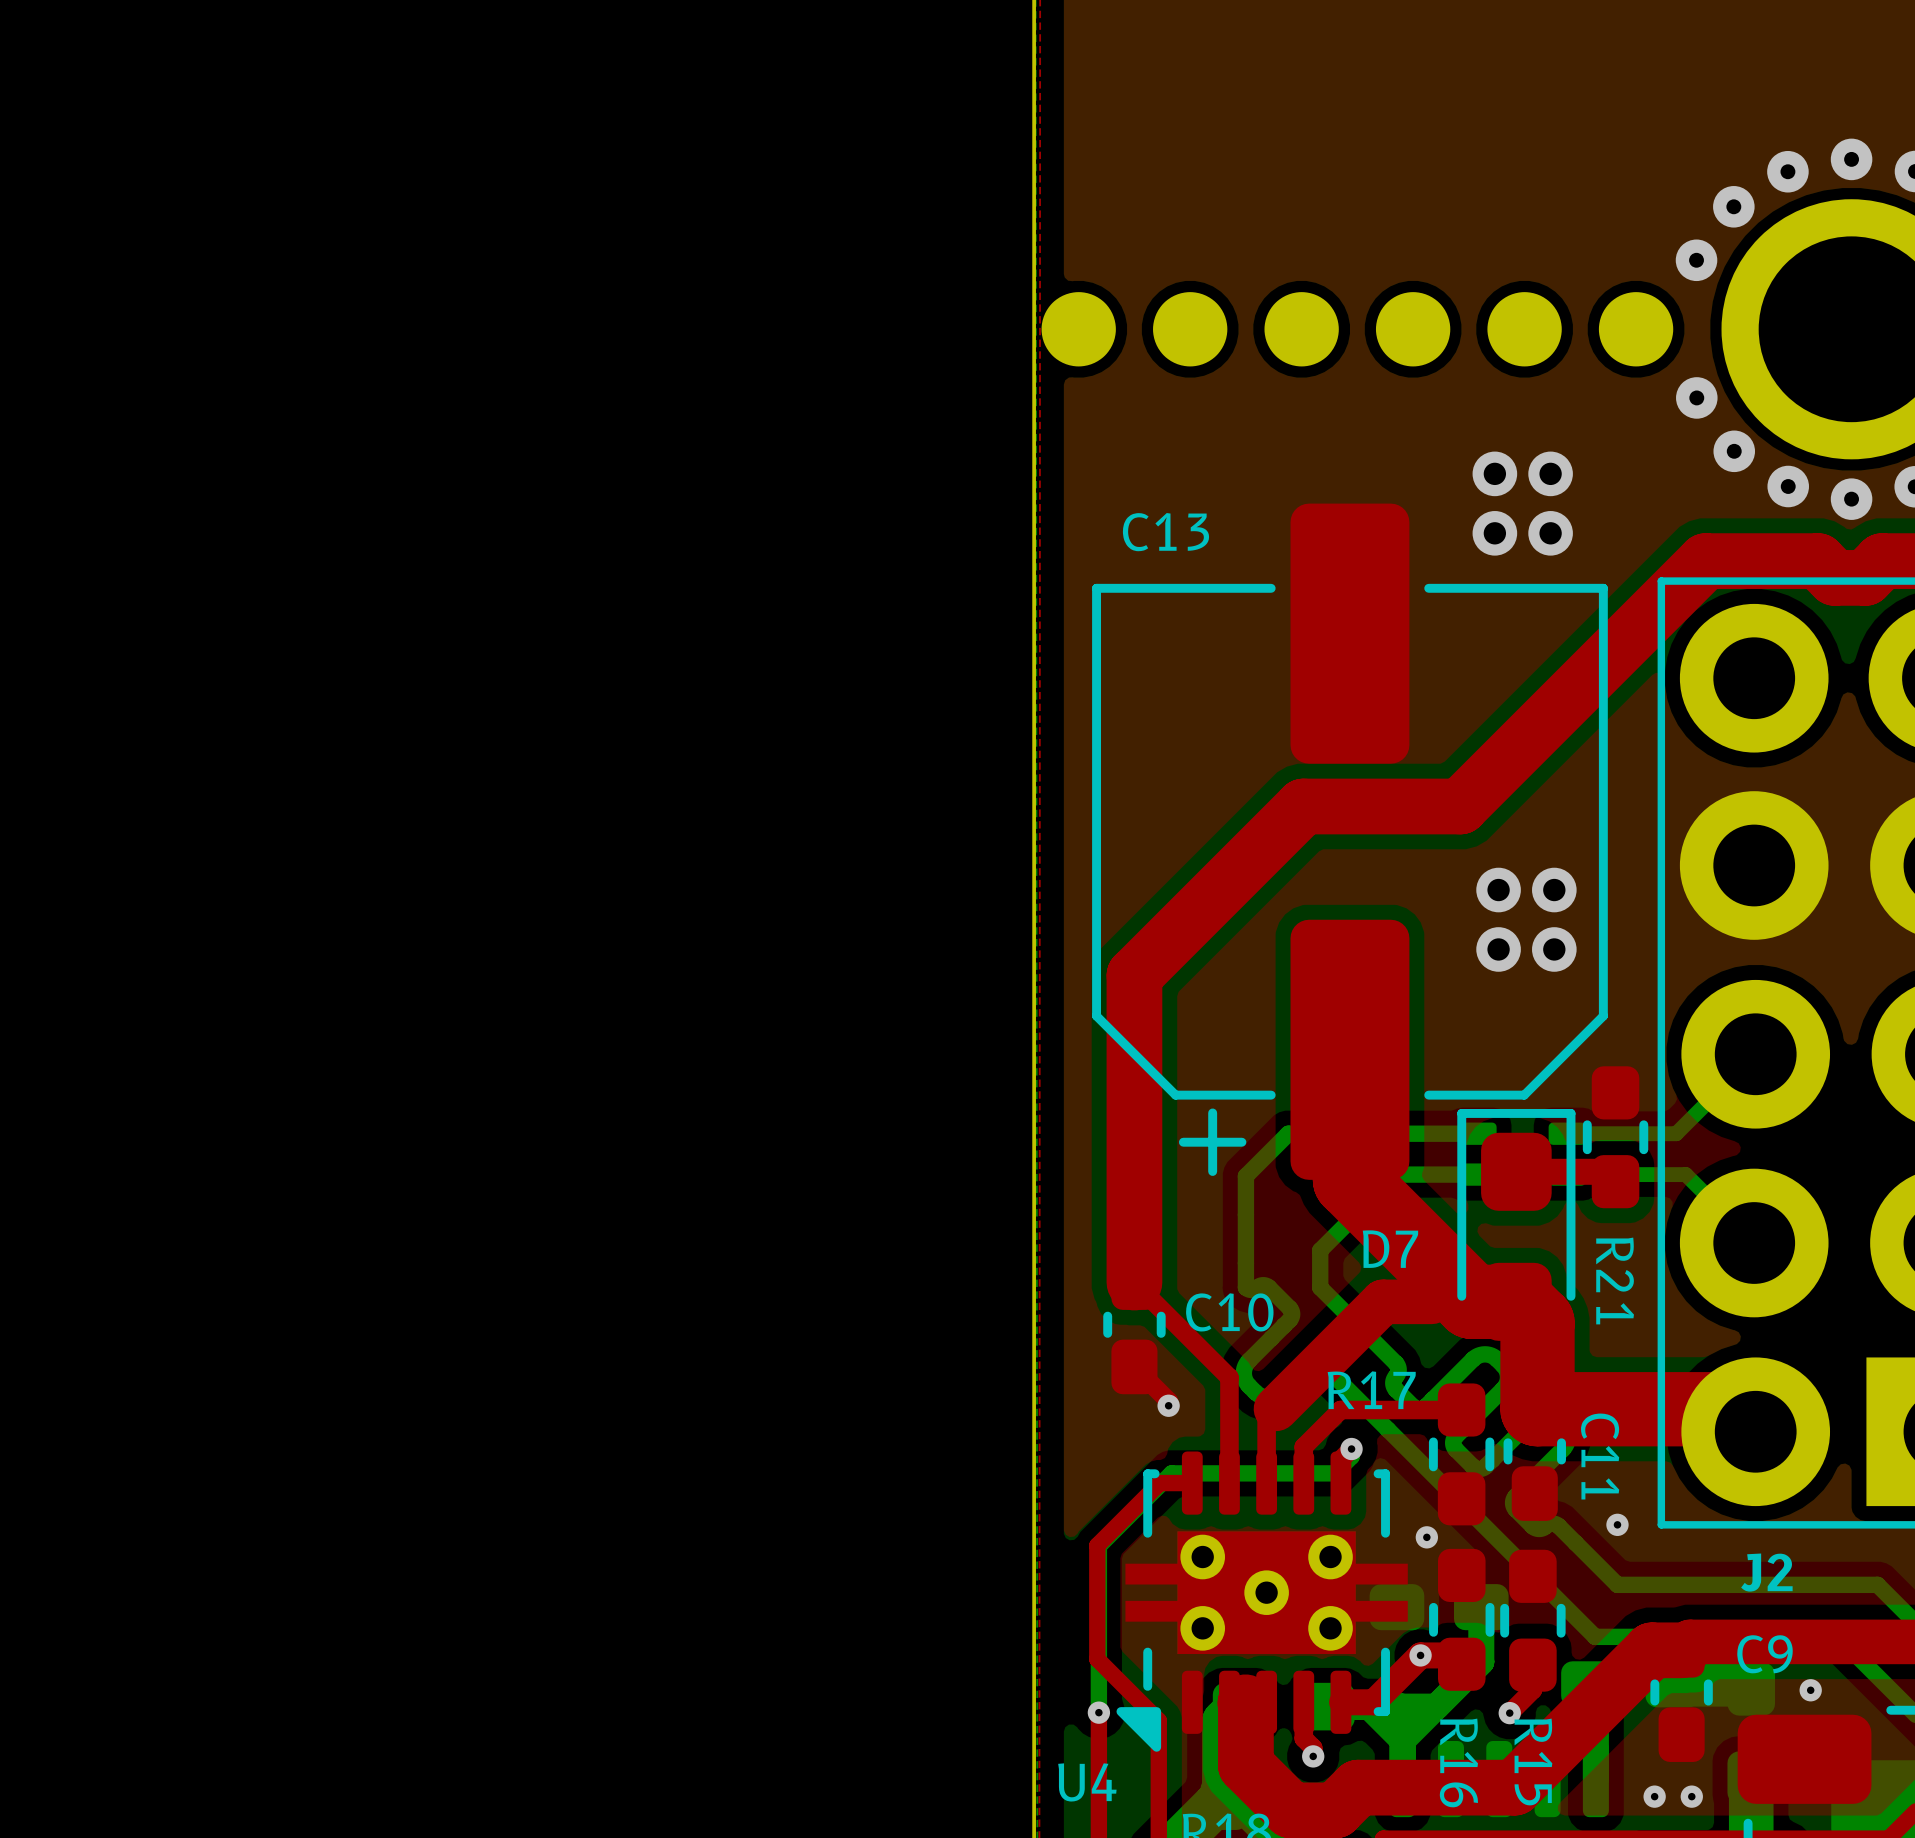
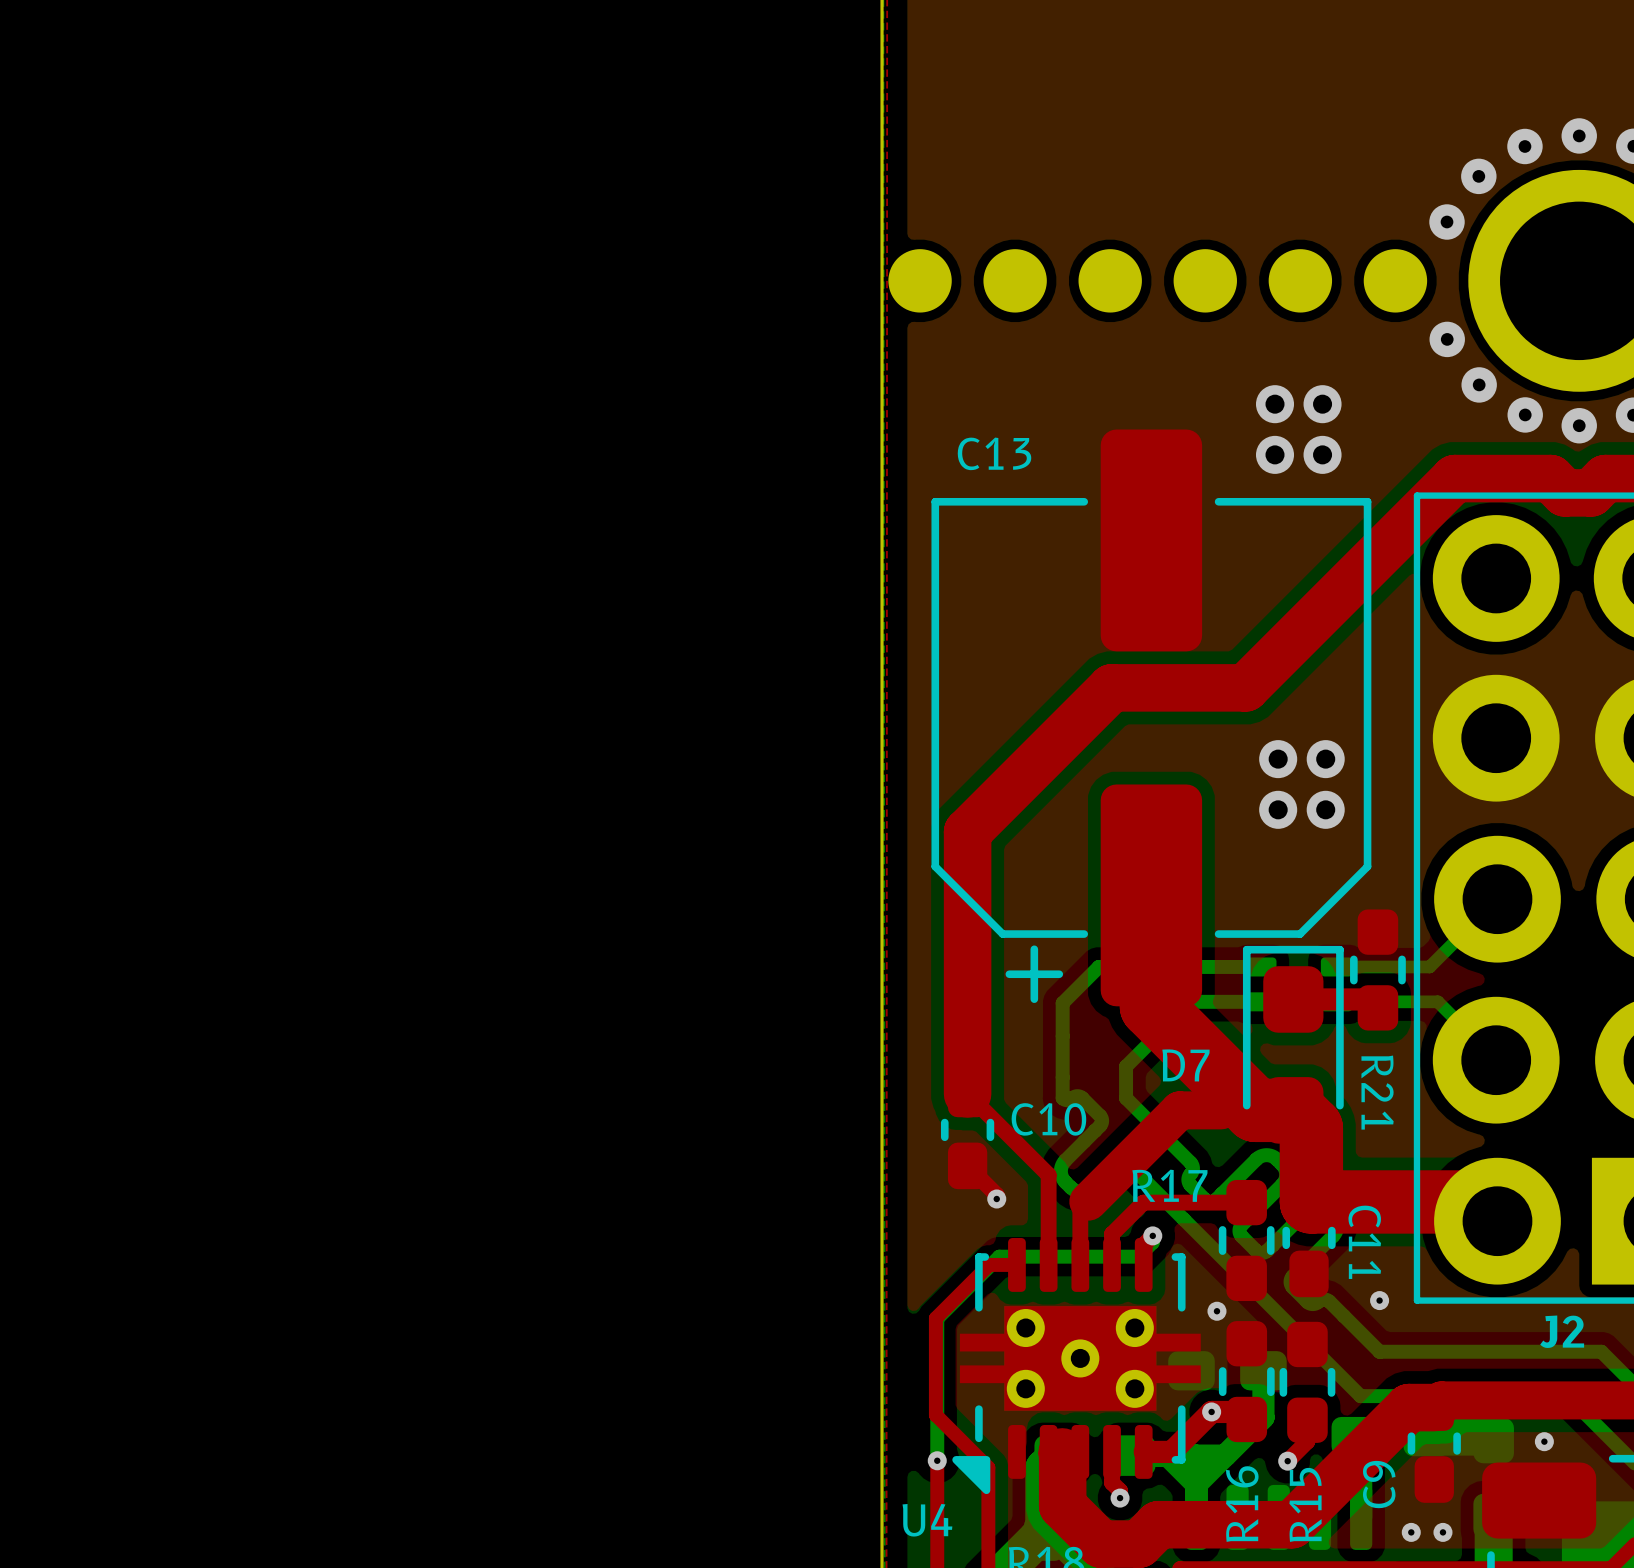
J2 name position: J2 (1766, 1572) -> J2 (1562, 1331)
C9 name rotation: 0° (1765, 1654) -> 90° counterclockwise (1379, 1484)
C9 name position: C9 (1765, 1654) -> C9 (1379, 1484)
R16 name rotation: 0° (1458, 1762) -> 180° (1242, 1504)
R15 name rotation: 0° (1533, 1762) -> 180° (1305, 1504)

